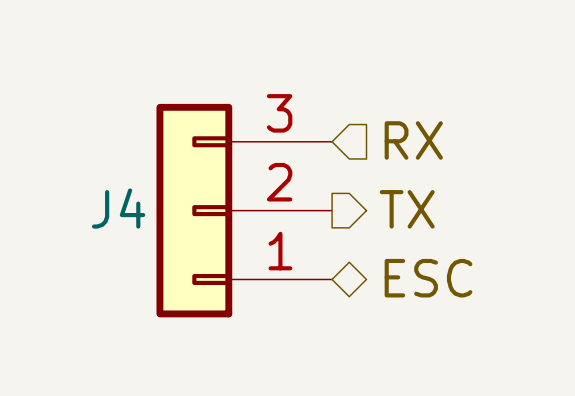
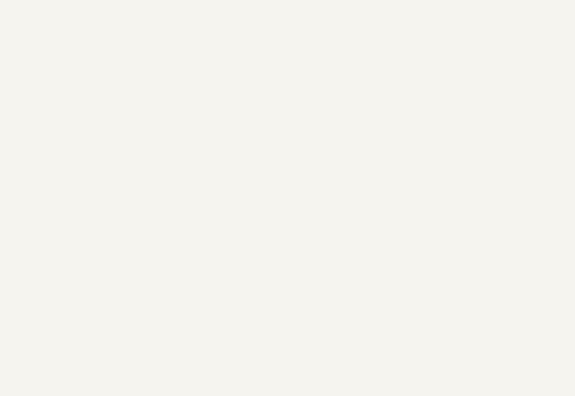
hierarchical label: RX (413, 140) -> none
hierarchical label: TX (407, 209) -> none
J4: (244, 210) -> none
hierarchical label: ESC (428, 278) -> none

